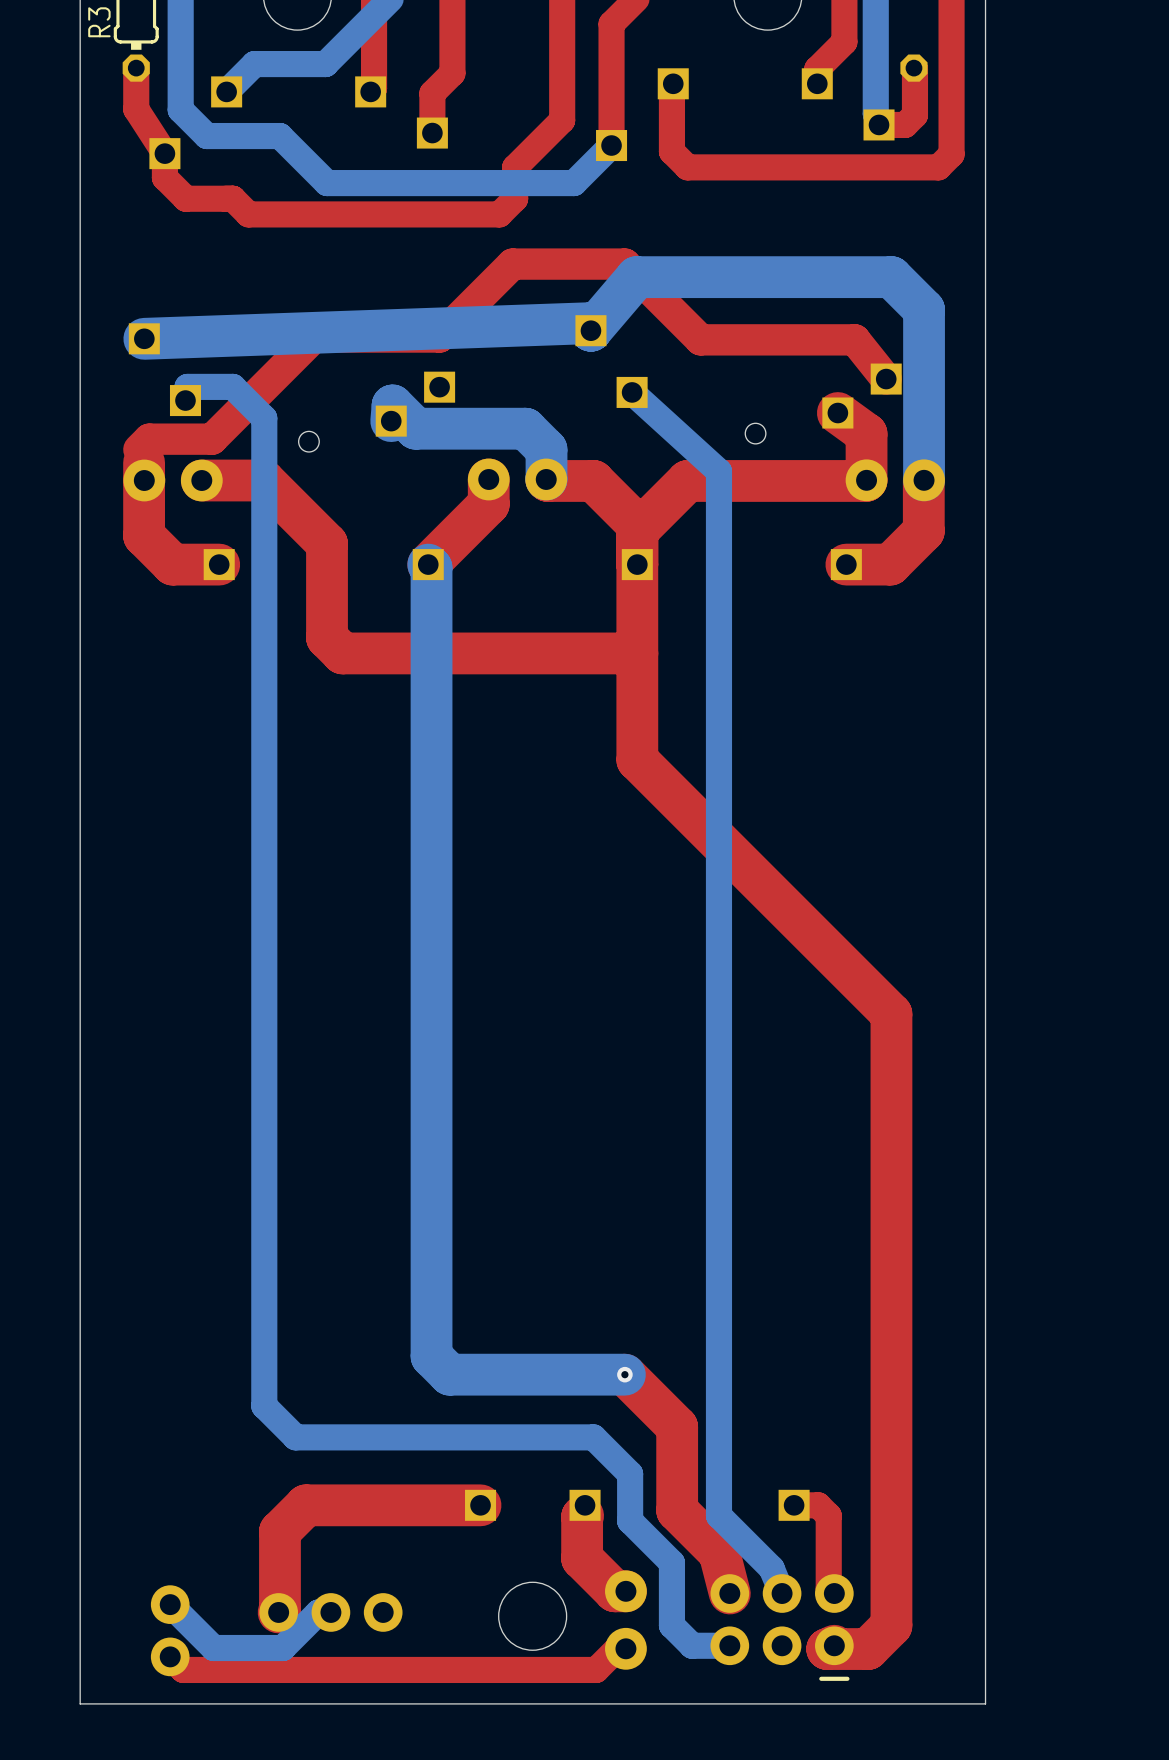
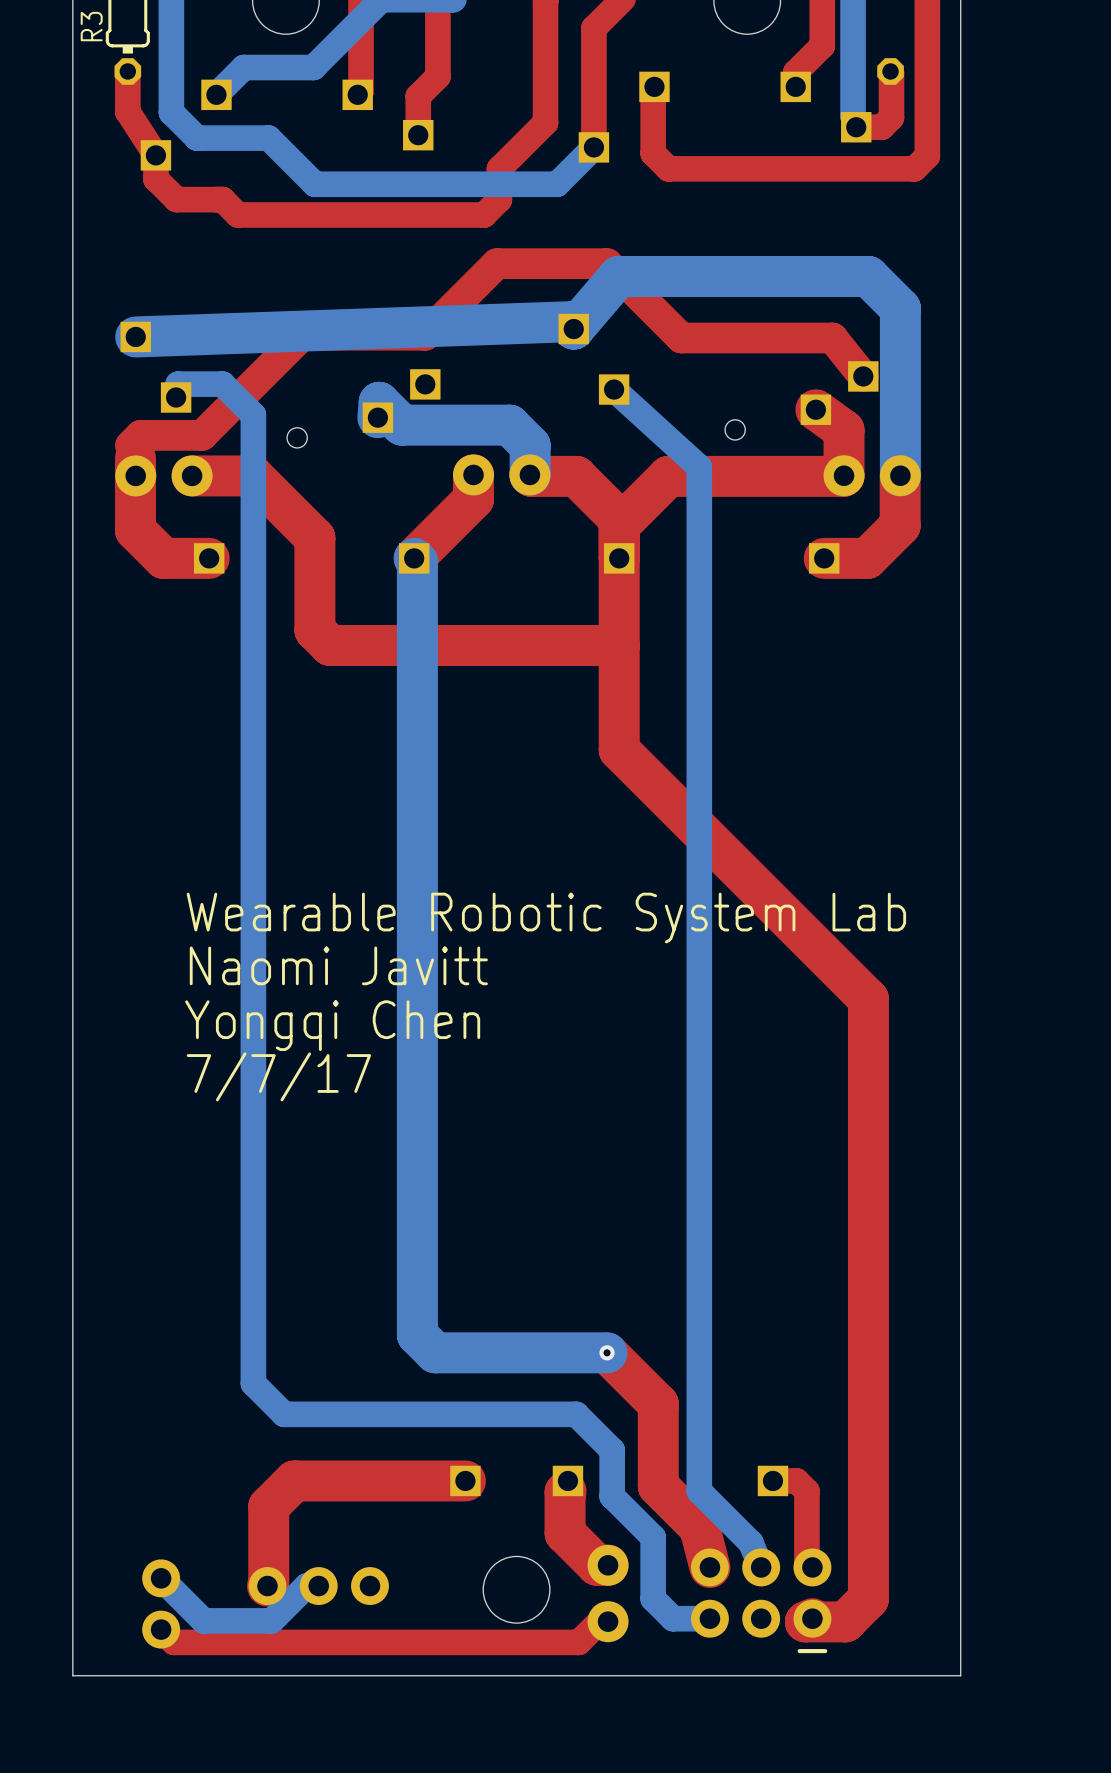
text: none -> Wearable Robotic System Lab (546, 918)
text: none -> Naomi Javitt (338, 965)
text: none -> Yongqi Chen (332, 1025)
text: none -> 7/7/17 (278, 1076)

